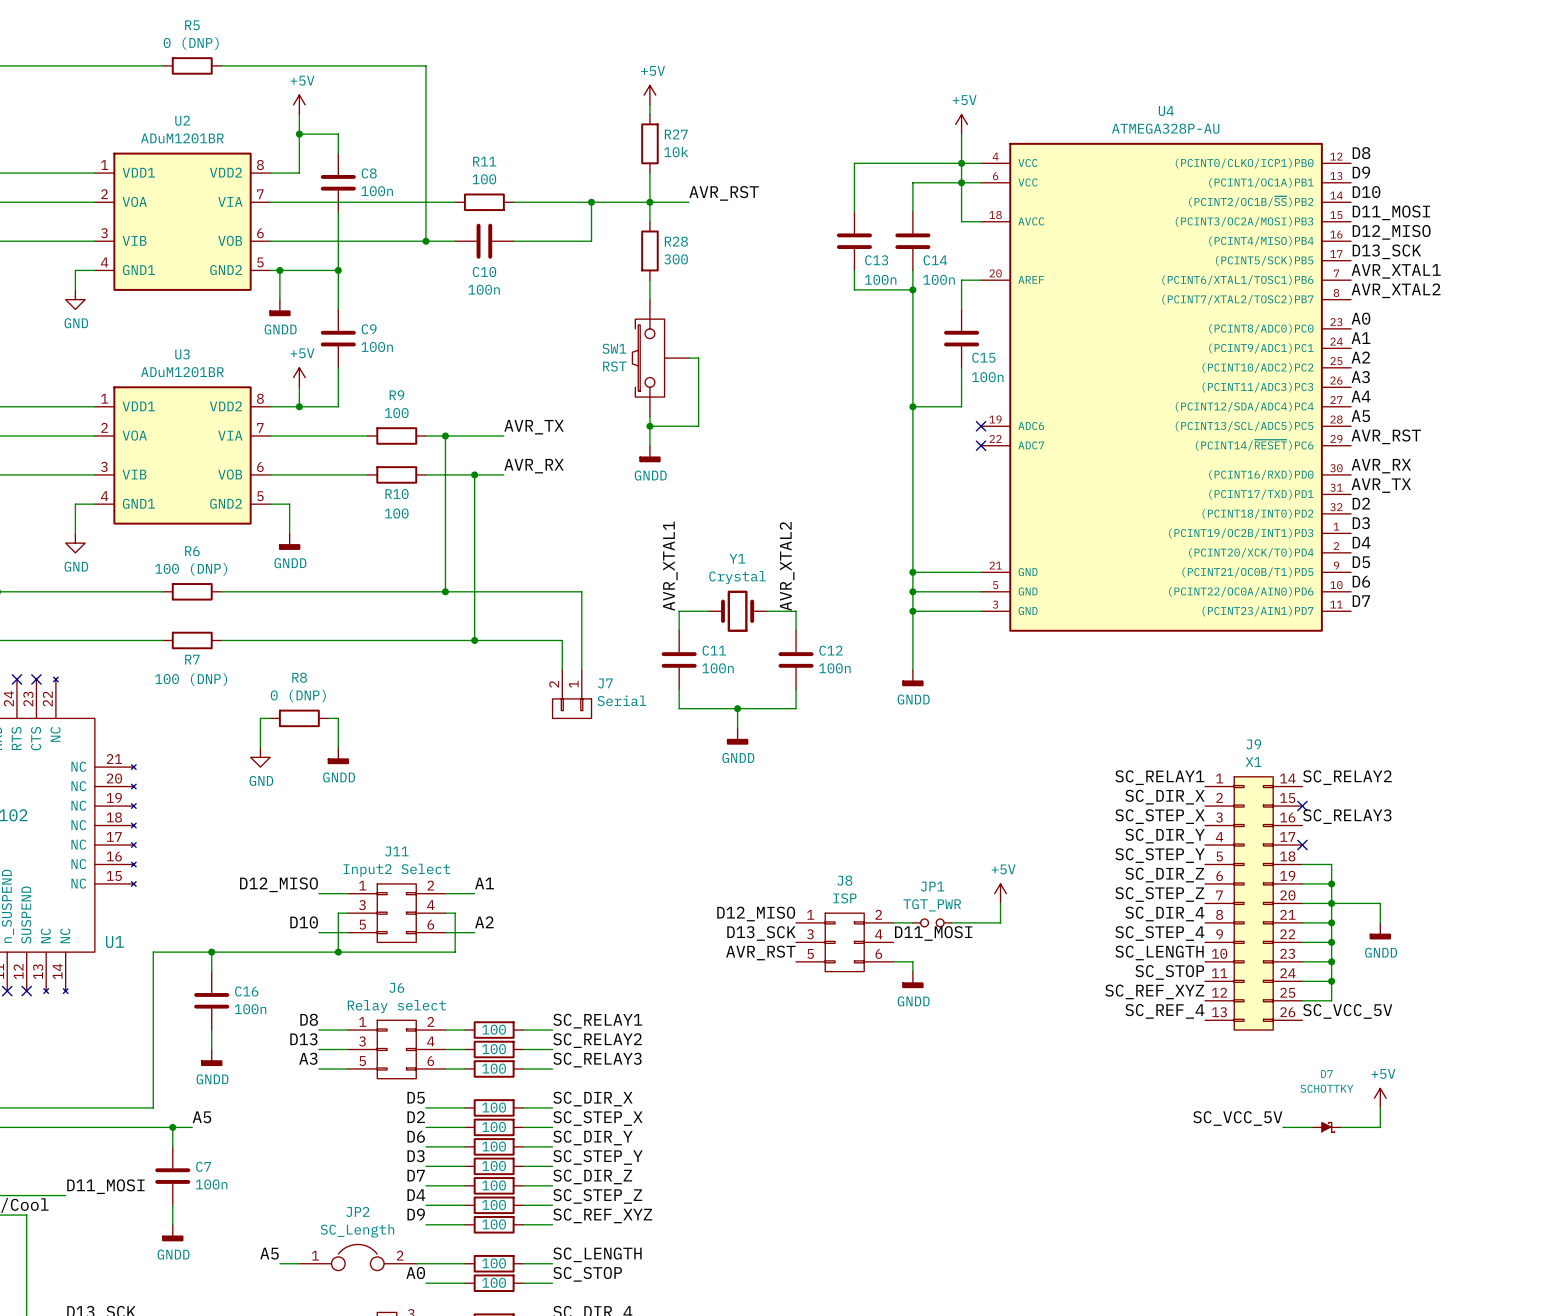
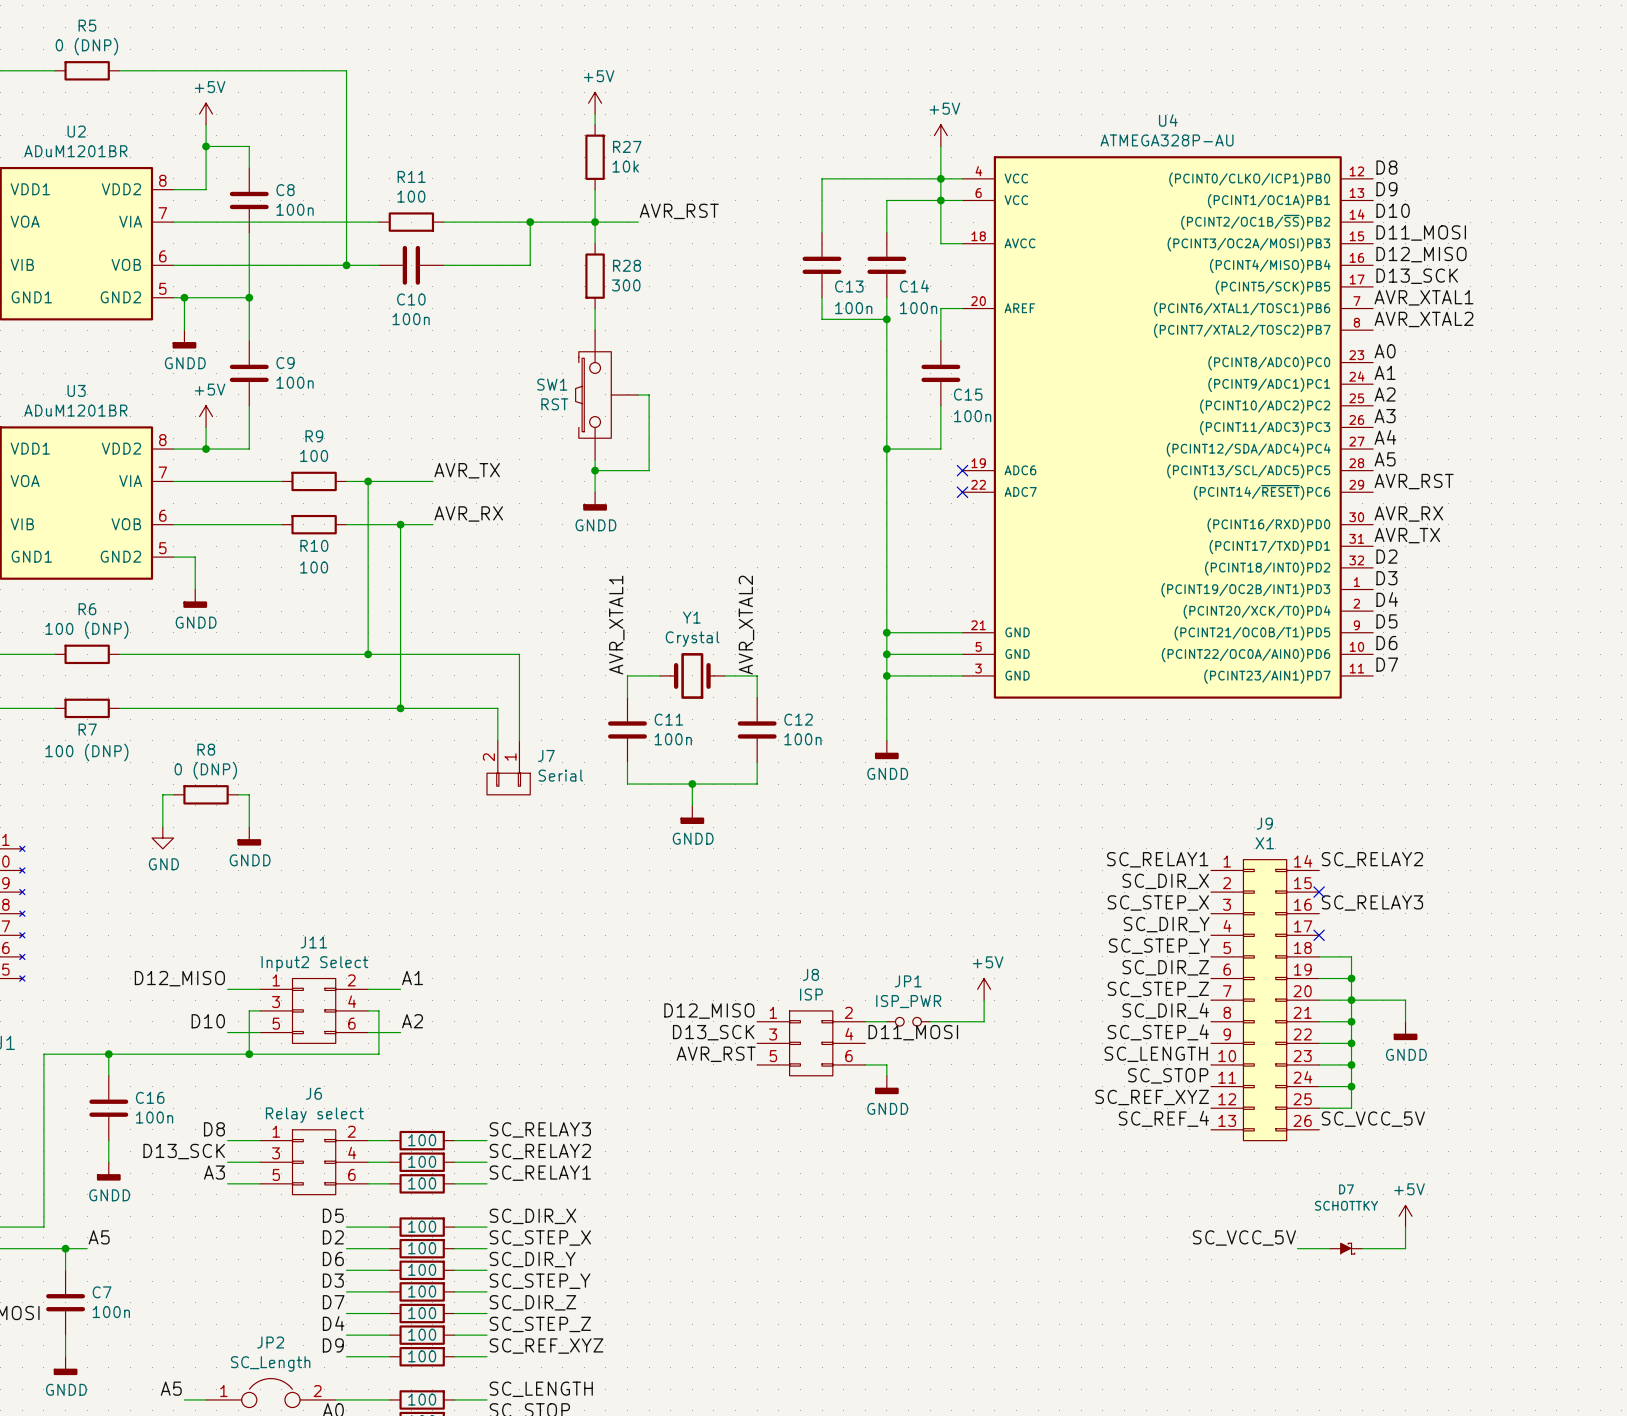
JP1 value: TGT_PWR (932, 905) -> ISP_PWR (908, 1001)
label: SC_RELAY1 (597, 1021) -> SC_RELAY3 (540, 1129)
label: D13 (303, 1039) -> D13_SCK (184, 1151)
label: SC_RELAY3 (597, 1060) -> SC_RELAY1 (540, 1173)

